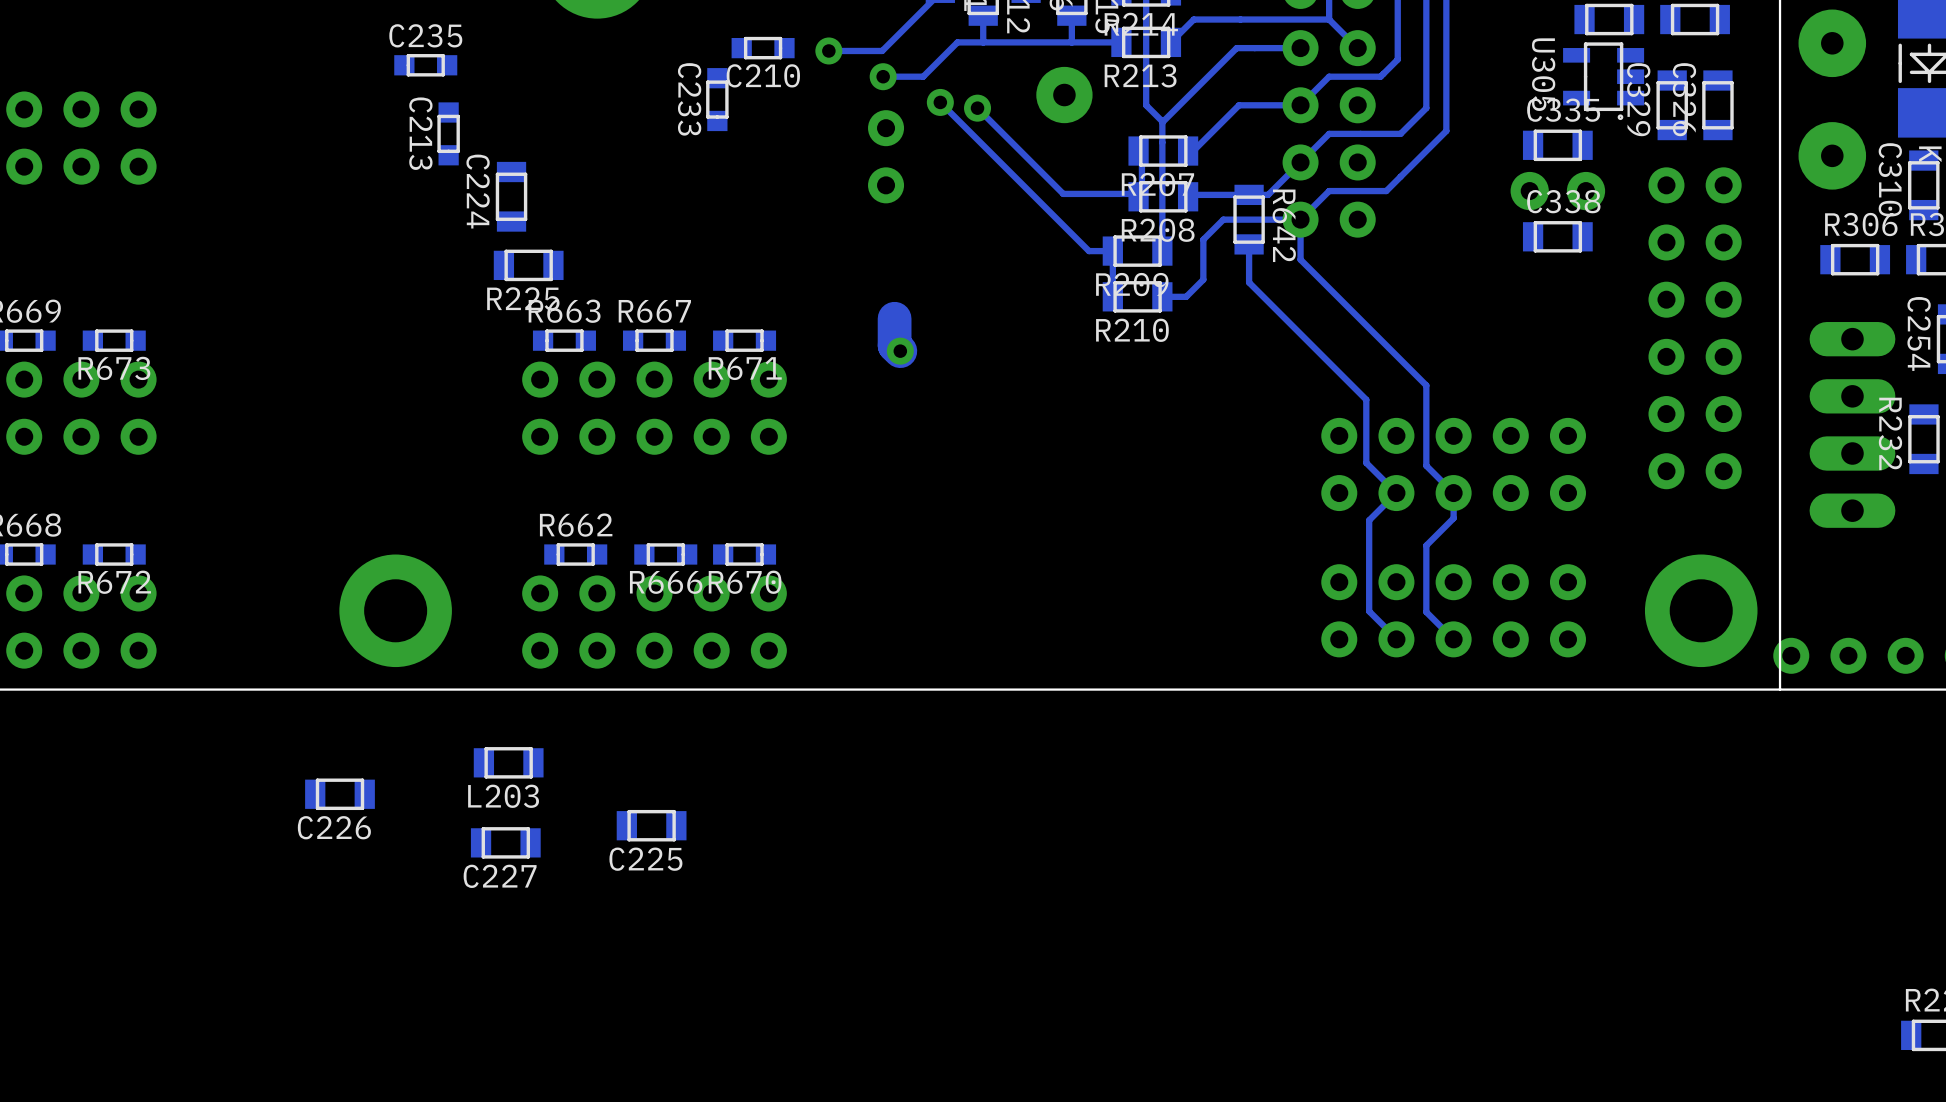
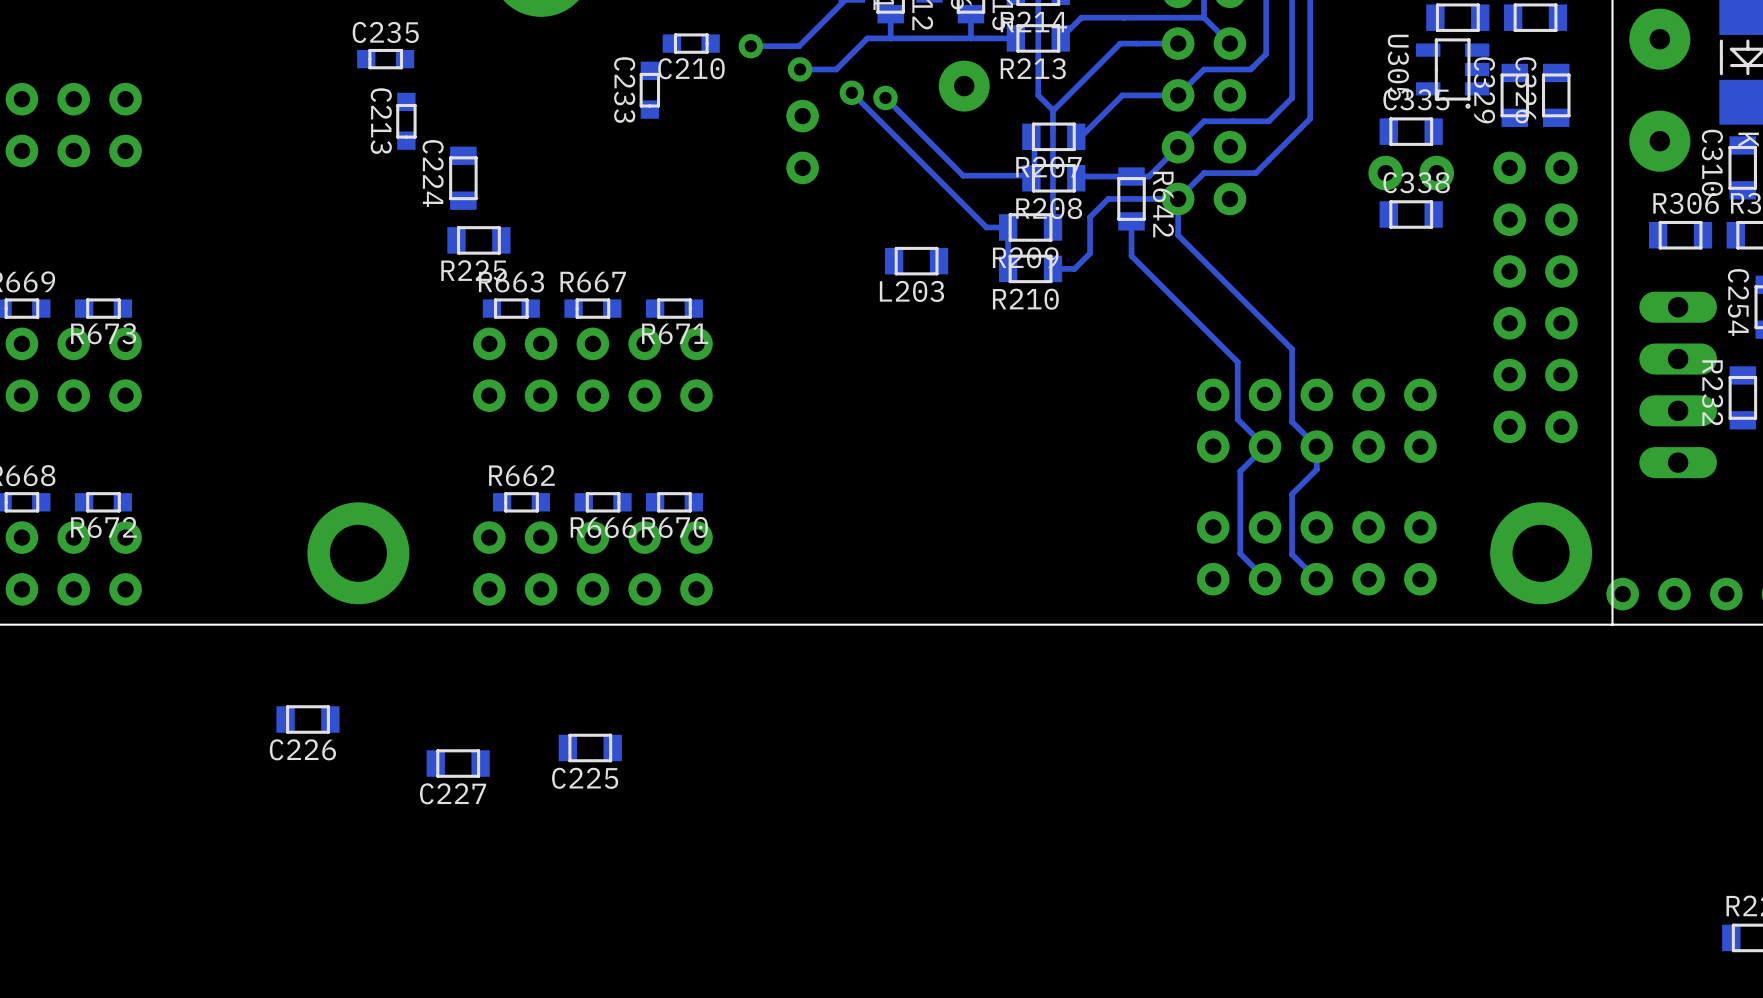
track: (894, 318) (894, 345) (900, 351) -> none
via: (900, 351) -> none
L203 position: (508, 762) -> (916, 261)

